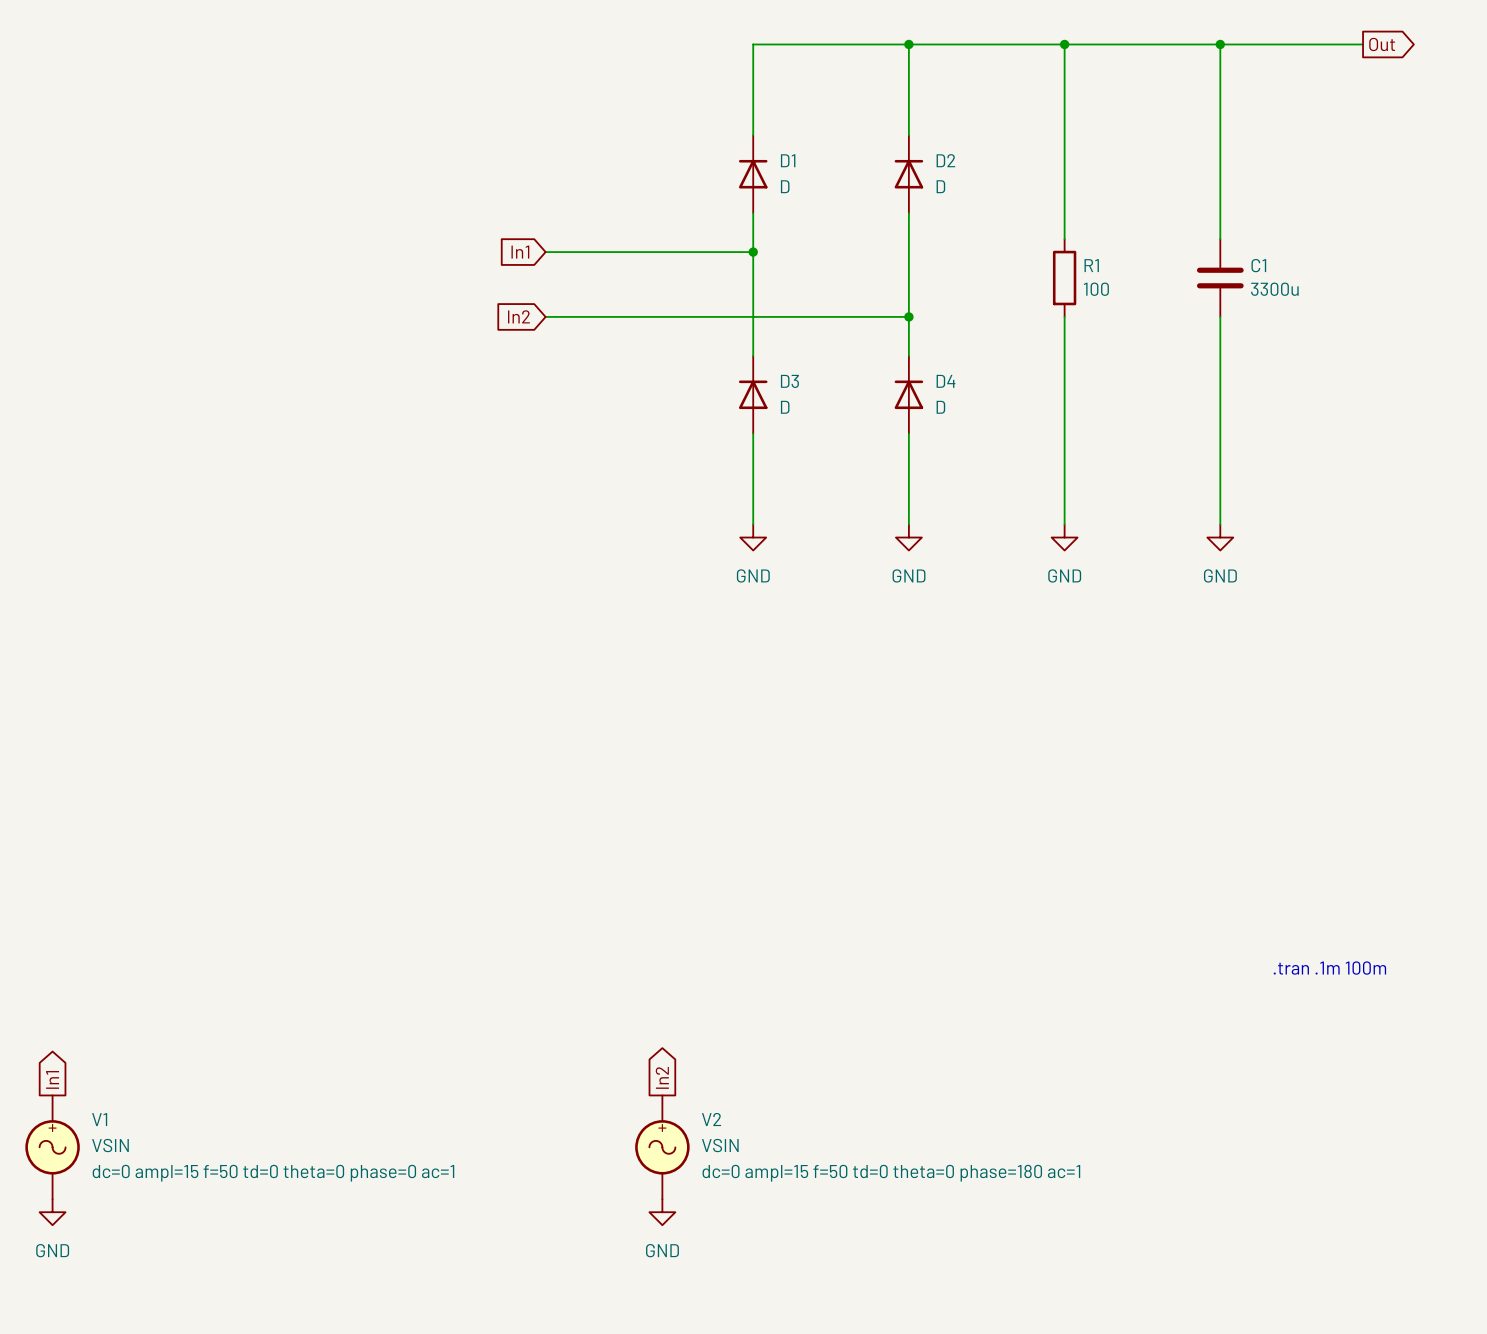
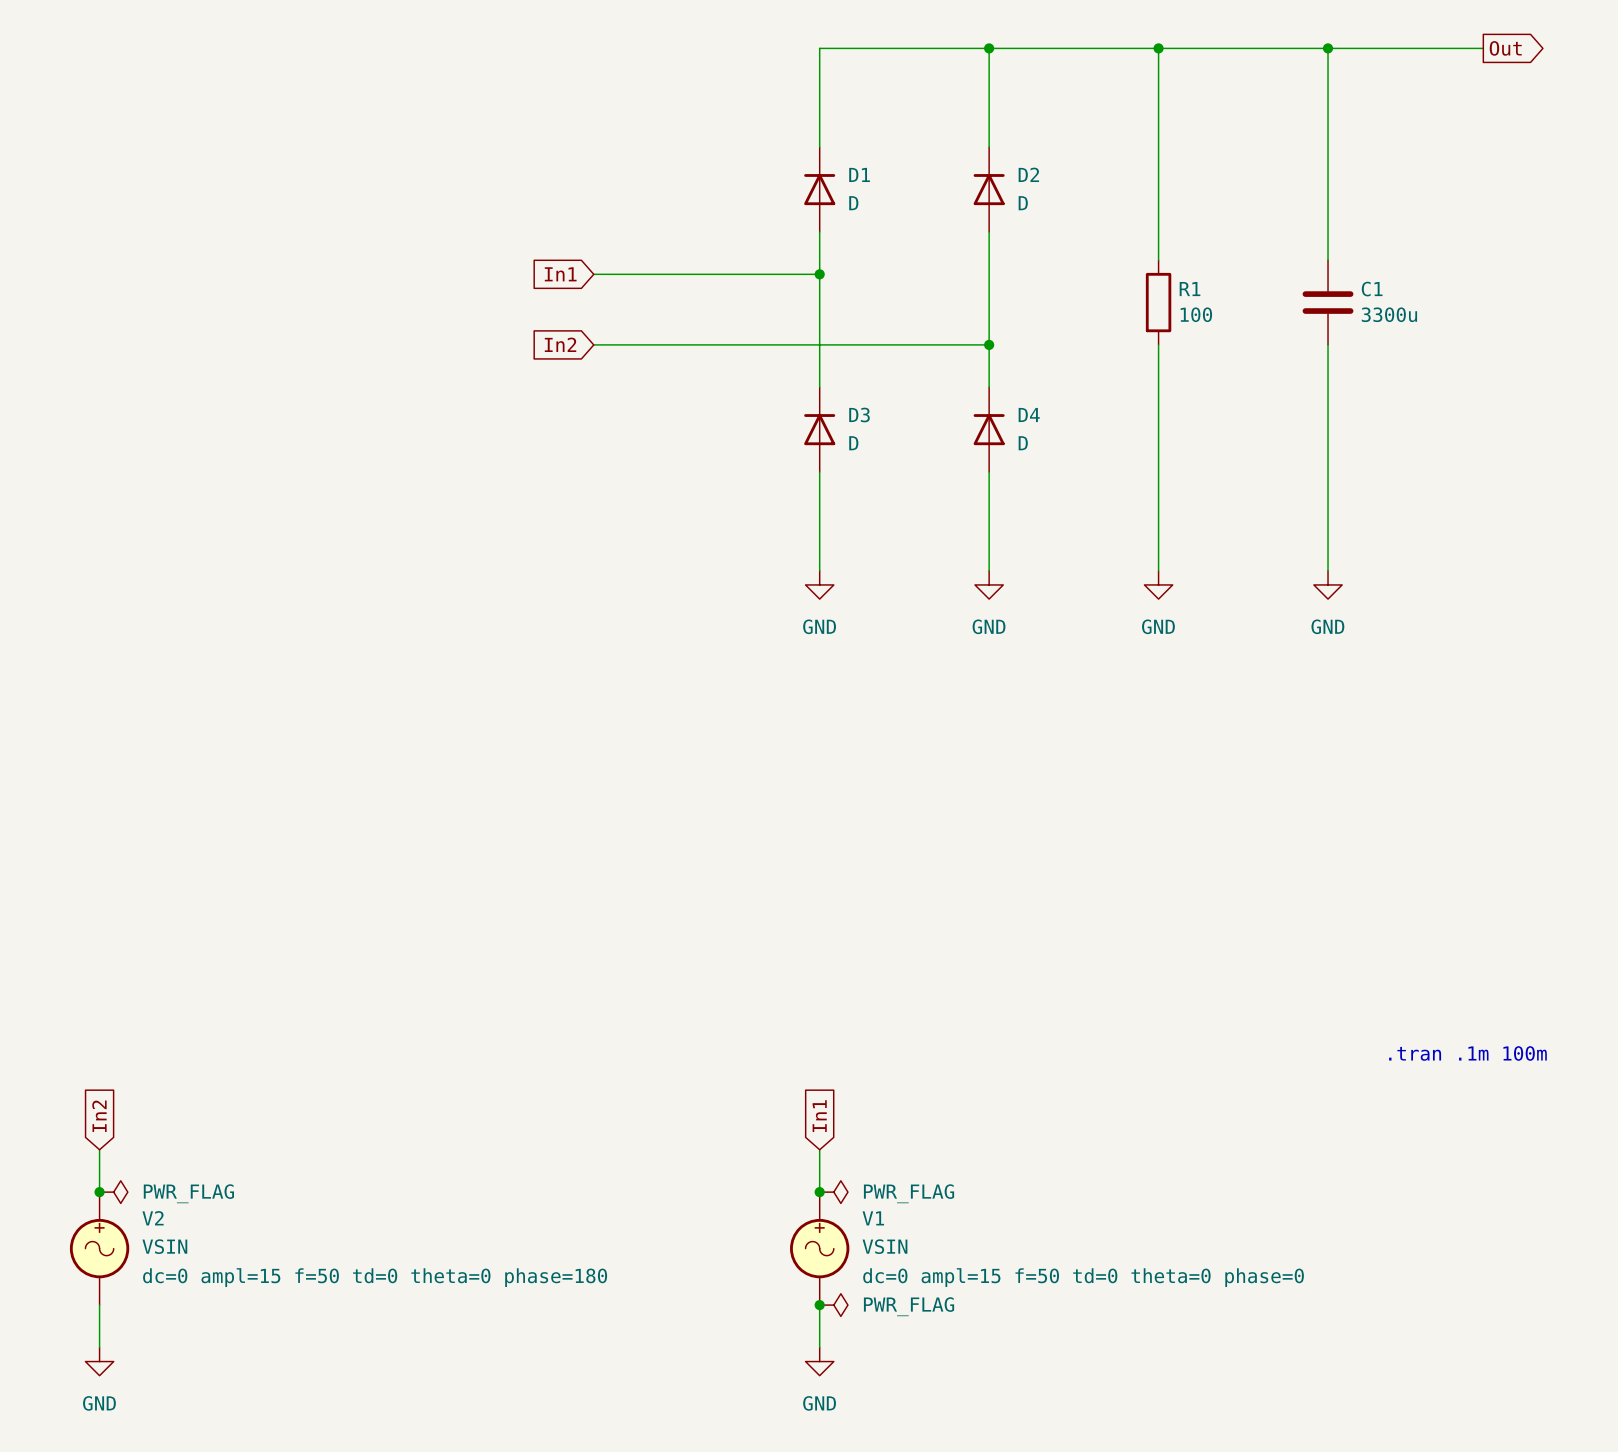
global label: none -> In2 (99, 1116)
global label: none -> In1 (819, 1116)
wire: none -> (99, 1149) (99, 1192)
wire: none -> (819, 1149) (819, 1192)
global label: In2 (662, 1077) -> none
global label: In1 (52, 1079) -> none
junction: none -> (99, 1192)
power symbol: none -> PWR_FLAG (113, 1192)
junction: none -> (819, 1192)
power symbol: none -> PWR_FLAG (833, 1192)
V1 position: (52, 1147) -> (819, 1248)
V2 position: (662, 1147) -> (99, 1248)
V1 text: dc=0 ampl=15 f=50 td=0 theta=0 phase=0 ac=1 (273, 1173) -> dc=0 ampl=15 f=50 td=0 theta=0 phase=0 (1083, 1277)
V2 text: dc=0 ampl=15 f=50 td=0 theta=0 phase=180 ac=1 (891, 1173) -> dc=0 ampl=15 f=50 td=0 theta=0 phase=180 (375, 1277)
wire: none -> (99, 1305) (99, 1347)
wire: none -> (819, 1305) (819, 1347)
junction: none -> (819, 1305)
power symbol: none -> PWR_FLAG (833, 1305)
power symbol position: GND (52, 1212) -> GND (99, 1361)
power symbol position: GND (662, 1212) -> GND (819, 1361)

